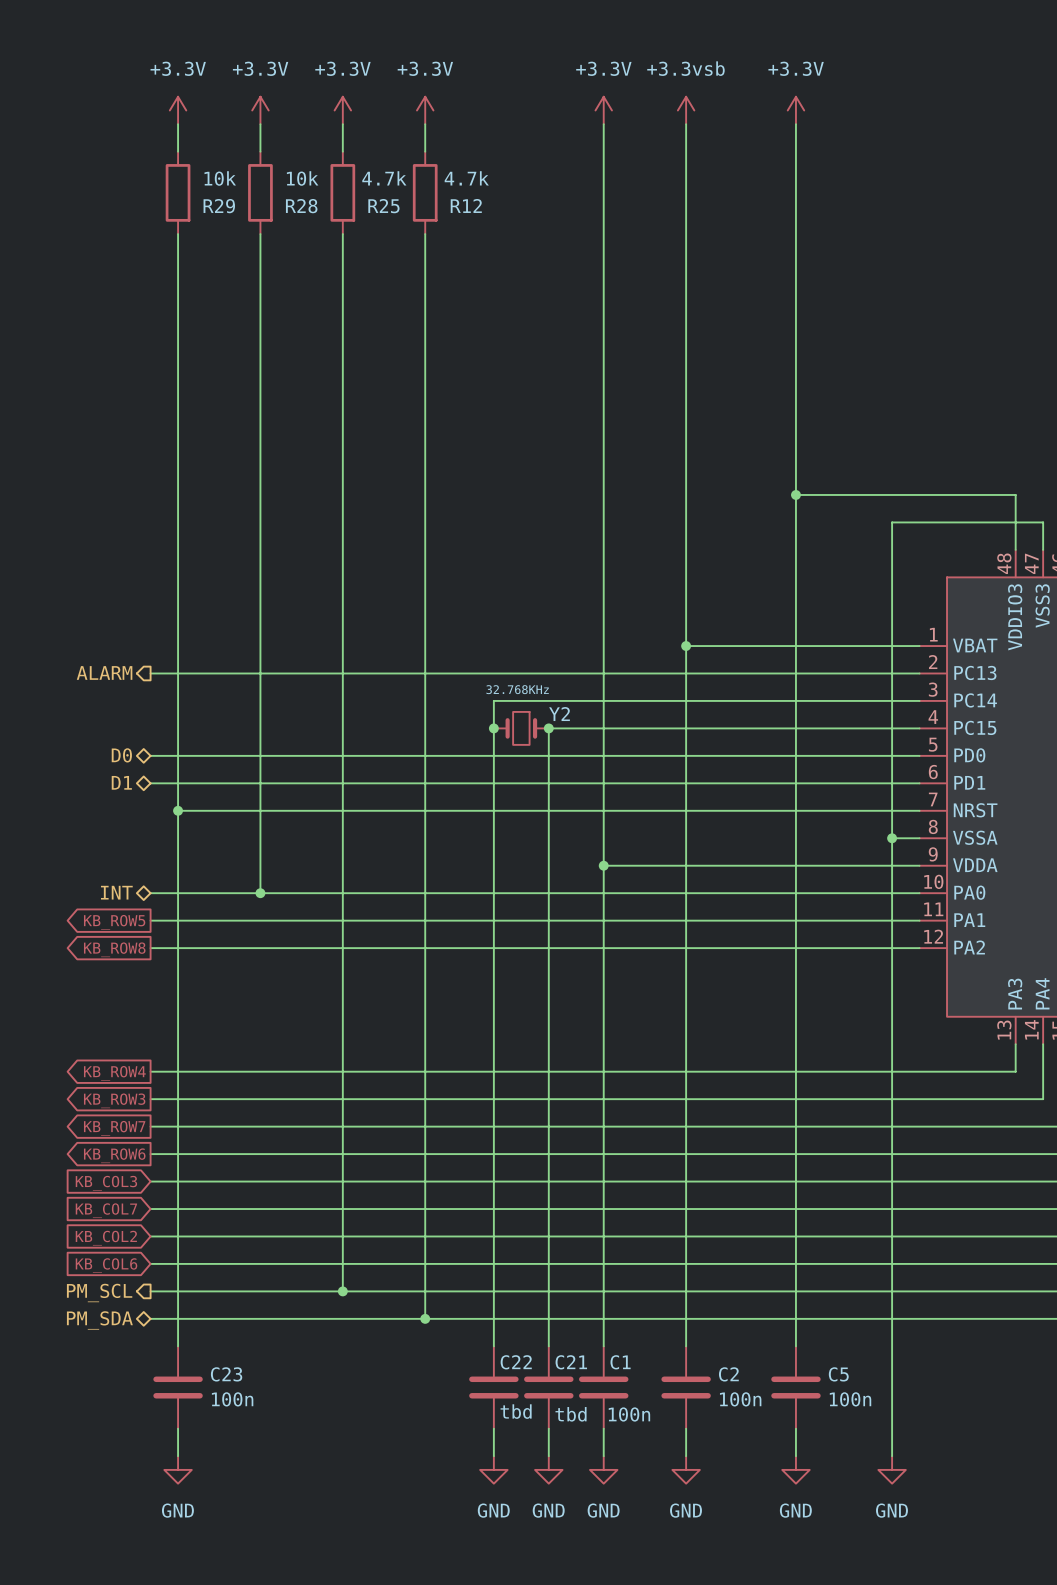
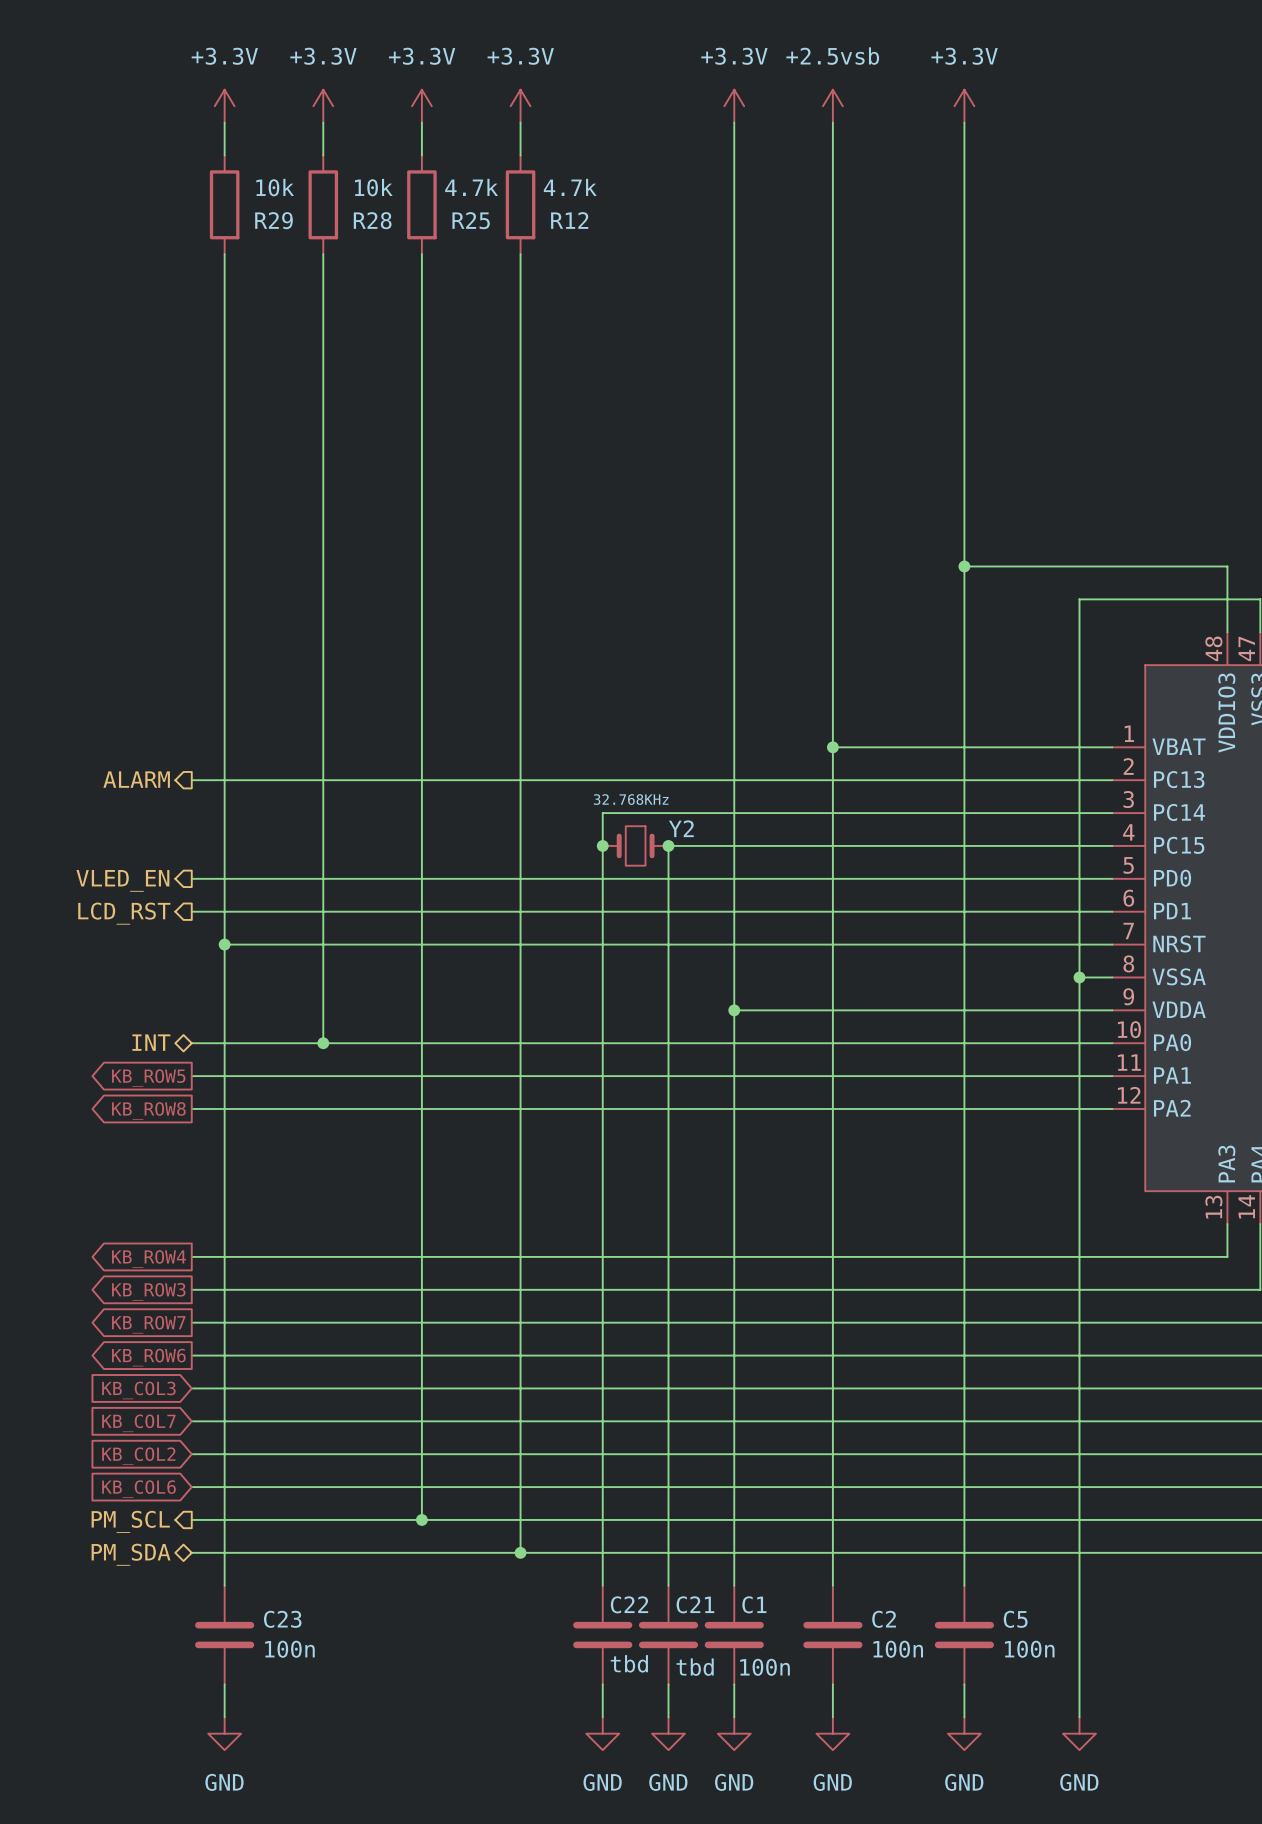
power symbol: +3.3vsb (686, 110) -> +2.5vsb (832, 106)
hierarchical label shape: bidirectional (121, 755) -> output (122, 880)
hierarchical label: D0 (121, 755) -> VLED_EN (122, 880)
hierarchical label shape: bidirectional (121, 782) -> output (124, 913)
hierarchical label: D1 (121, 782) -> LCD_RST (124, 913)

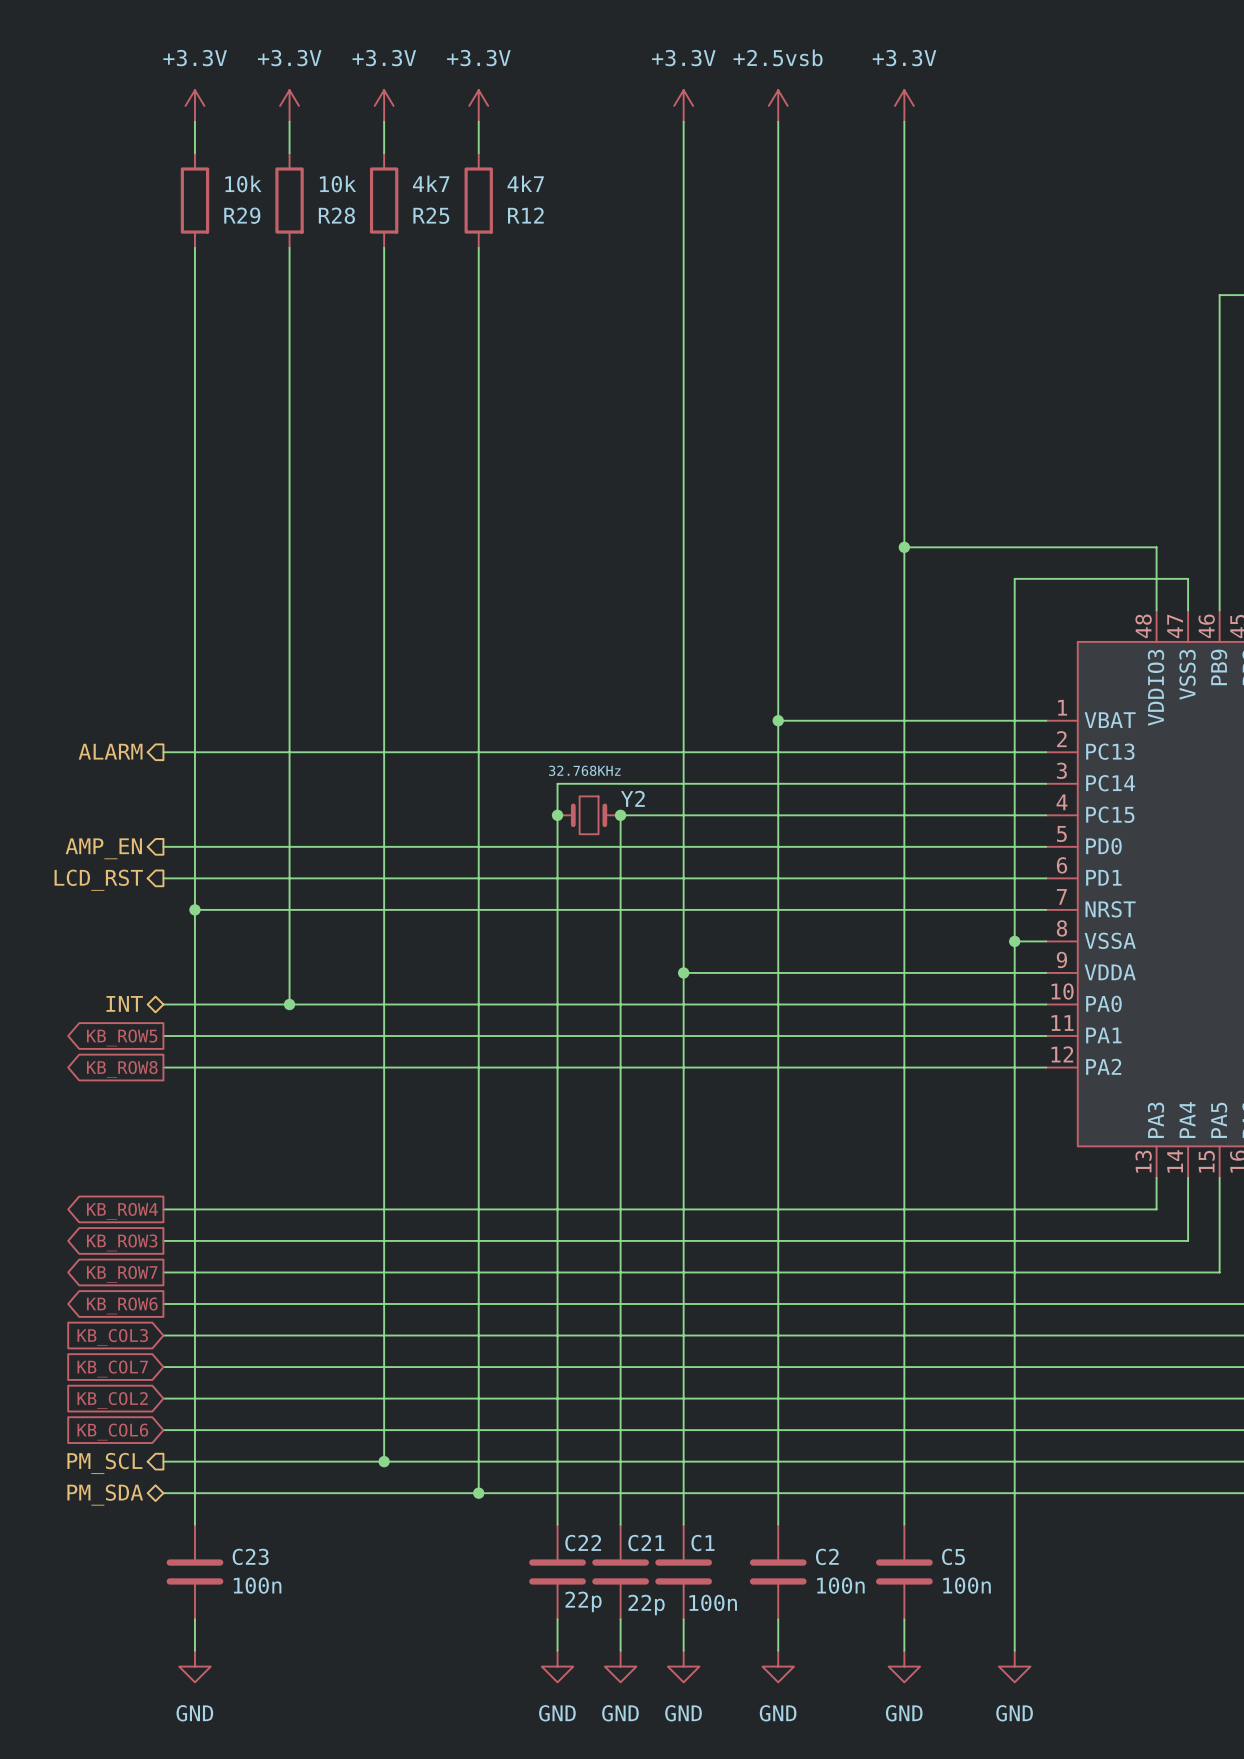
R25 value: 4.7k (471, 187) -> 4k7 (431, 183)
R12 value: 4.7k (570, 187) -> 4k7 (525, 183)
hierarchical label: VLED_EN (122, 880) -> AMP_EN (103, 848)
C22 value: tbd (629, 1663) -> 22p (583, 1601)
C21 value: tbd (695, 1667) -> 22p (646, 1605)

